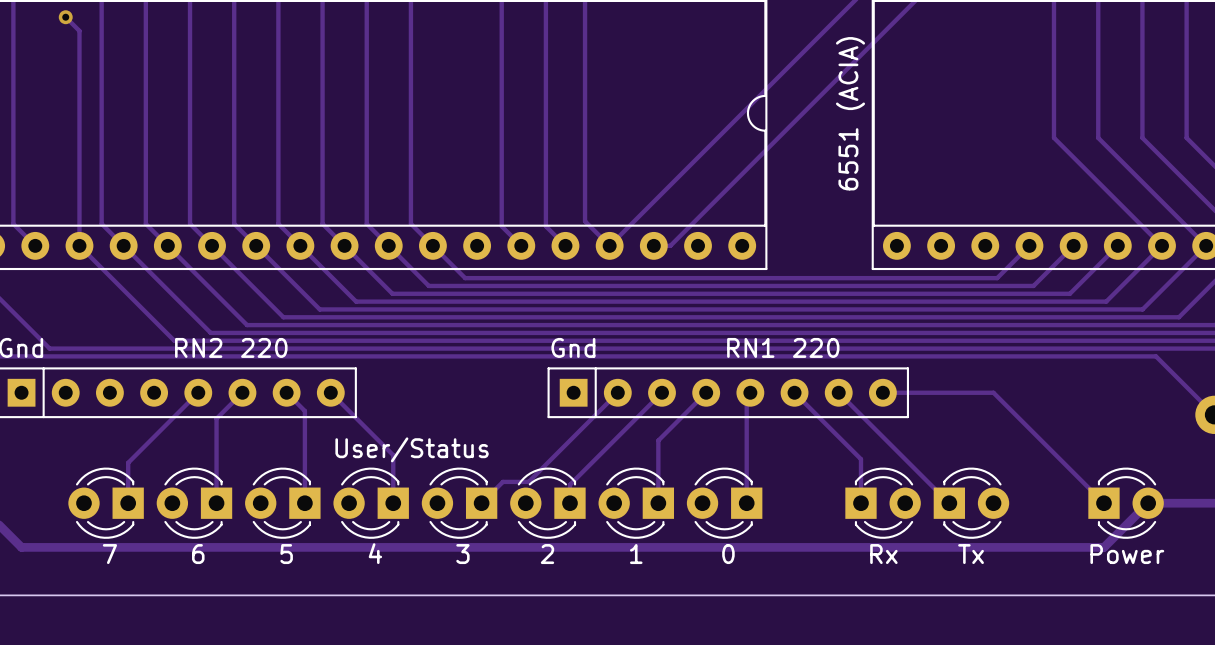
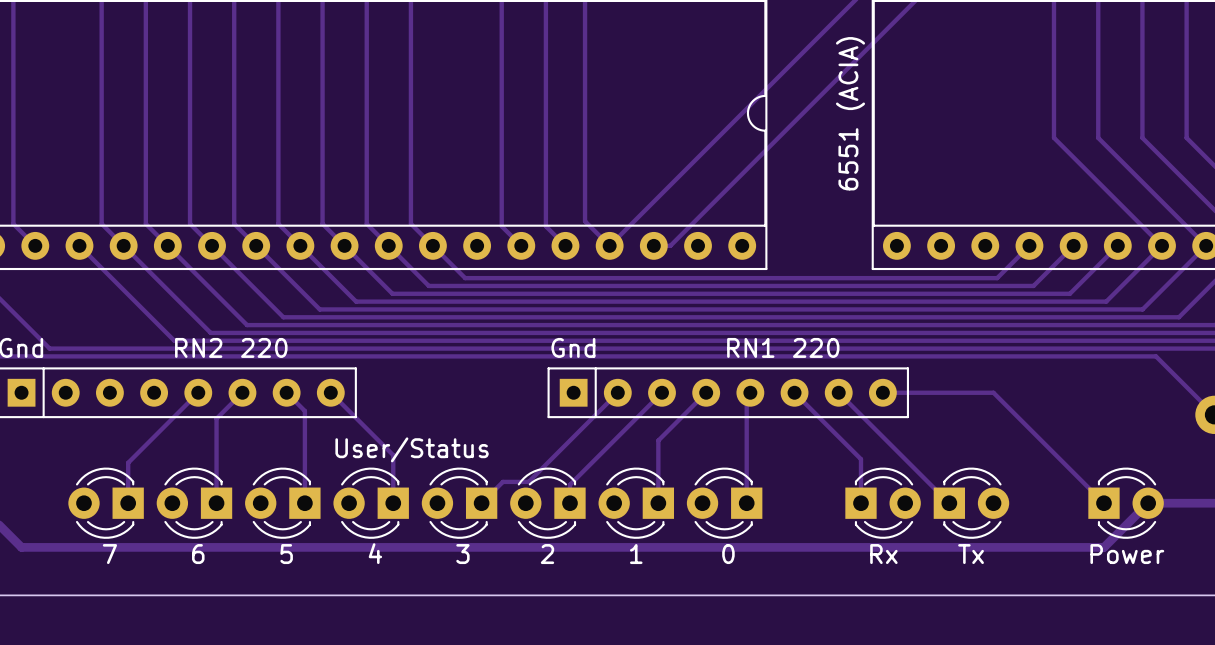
track: (65, 17) (79, 30) (79, 245) -> none
via: (65, 17) -> none

